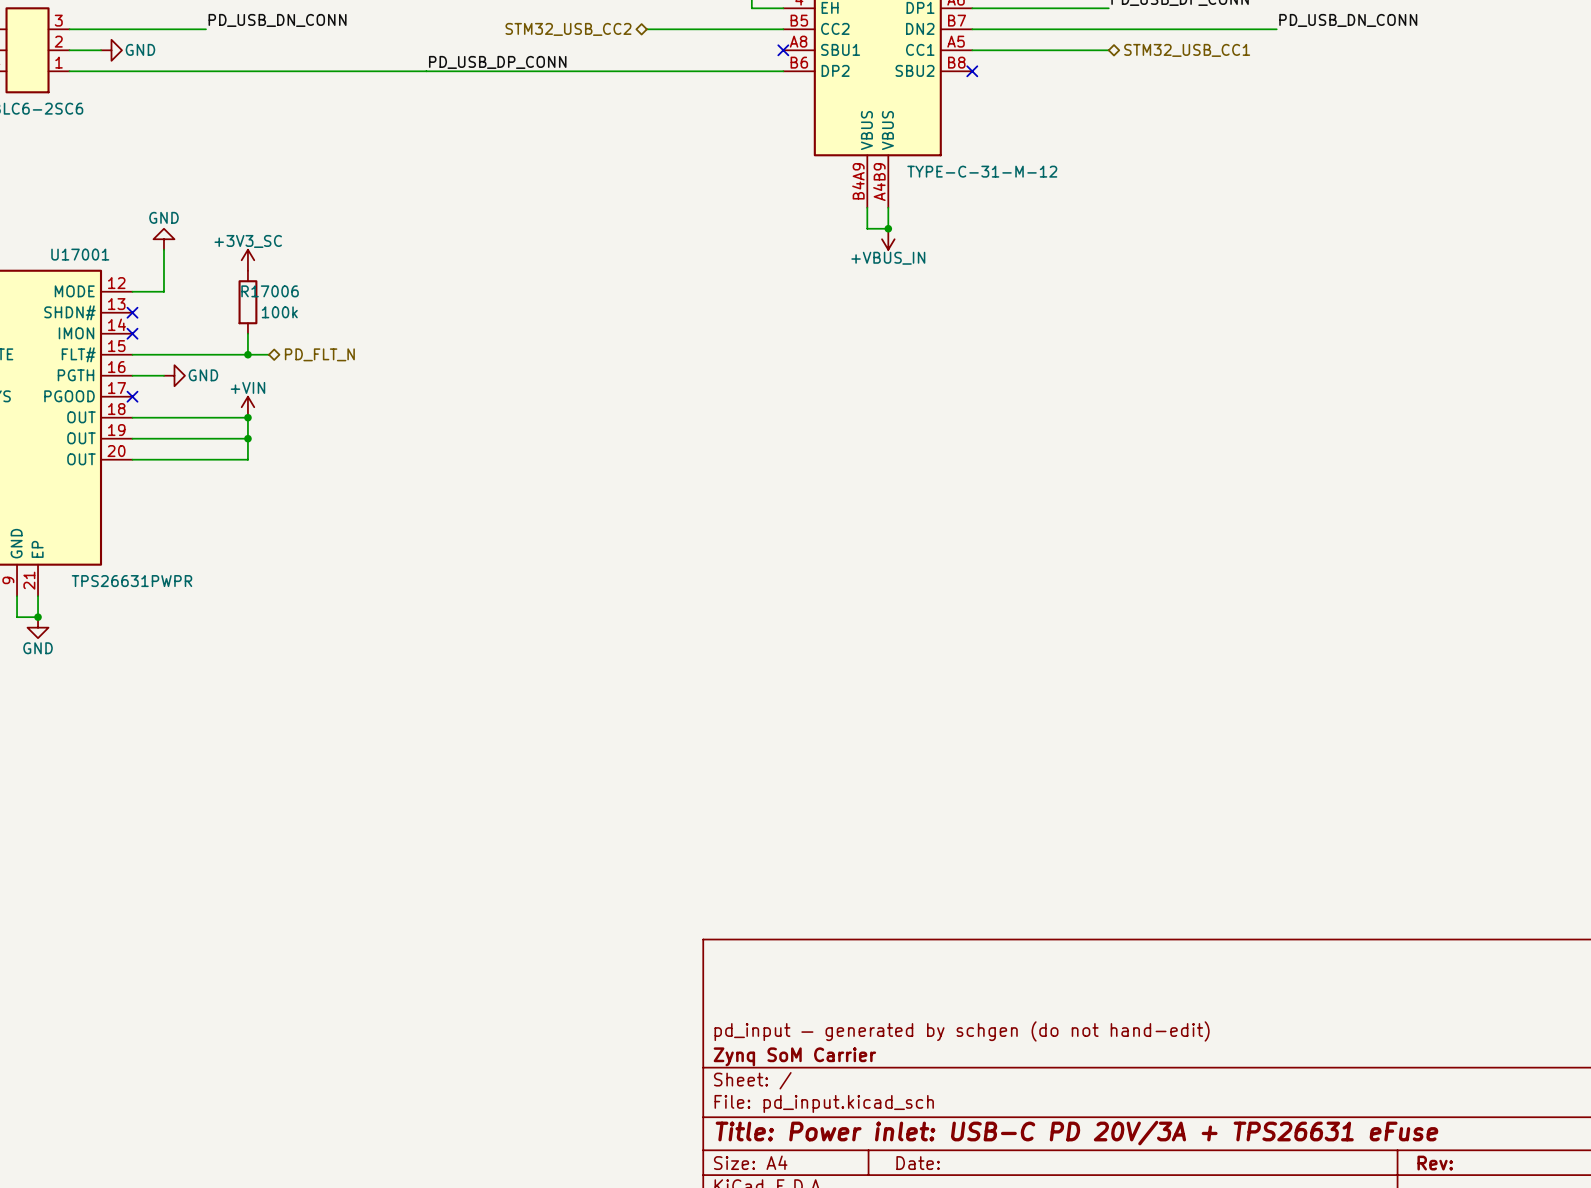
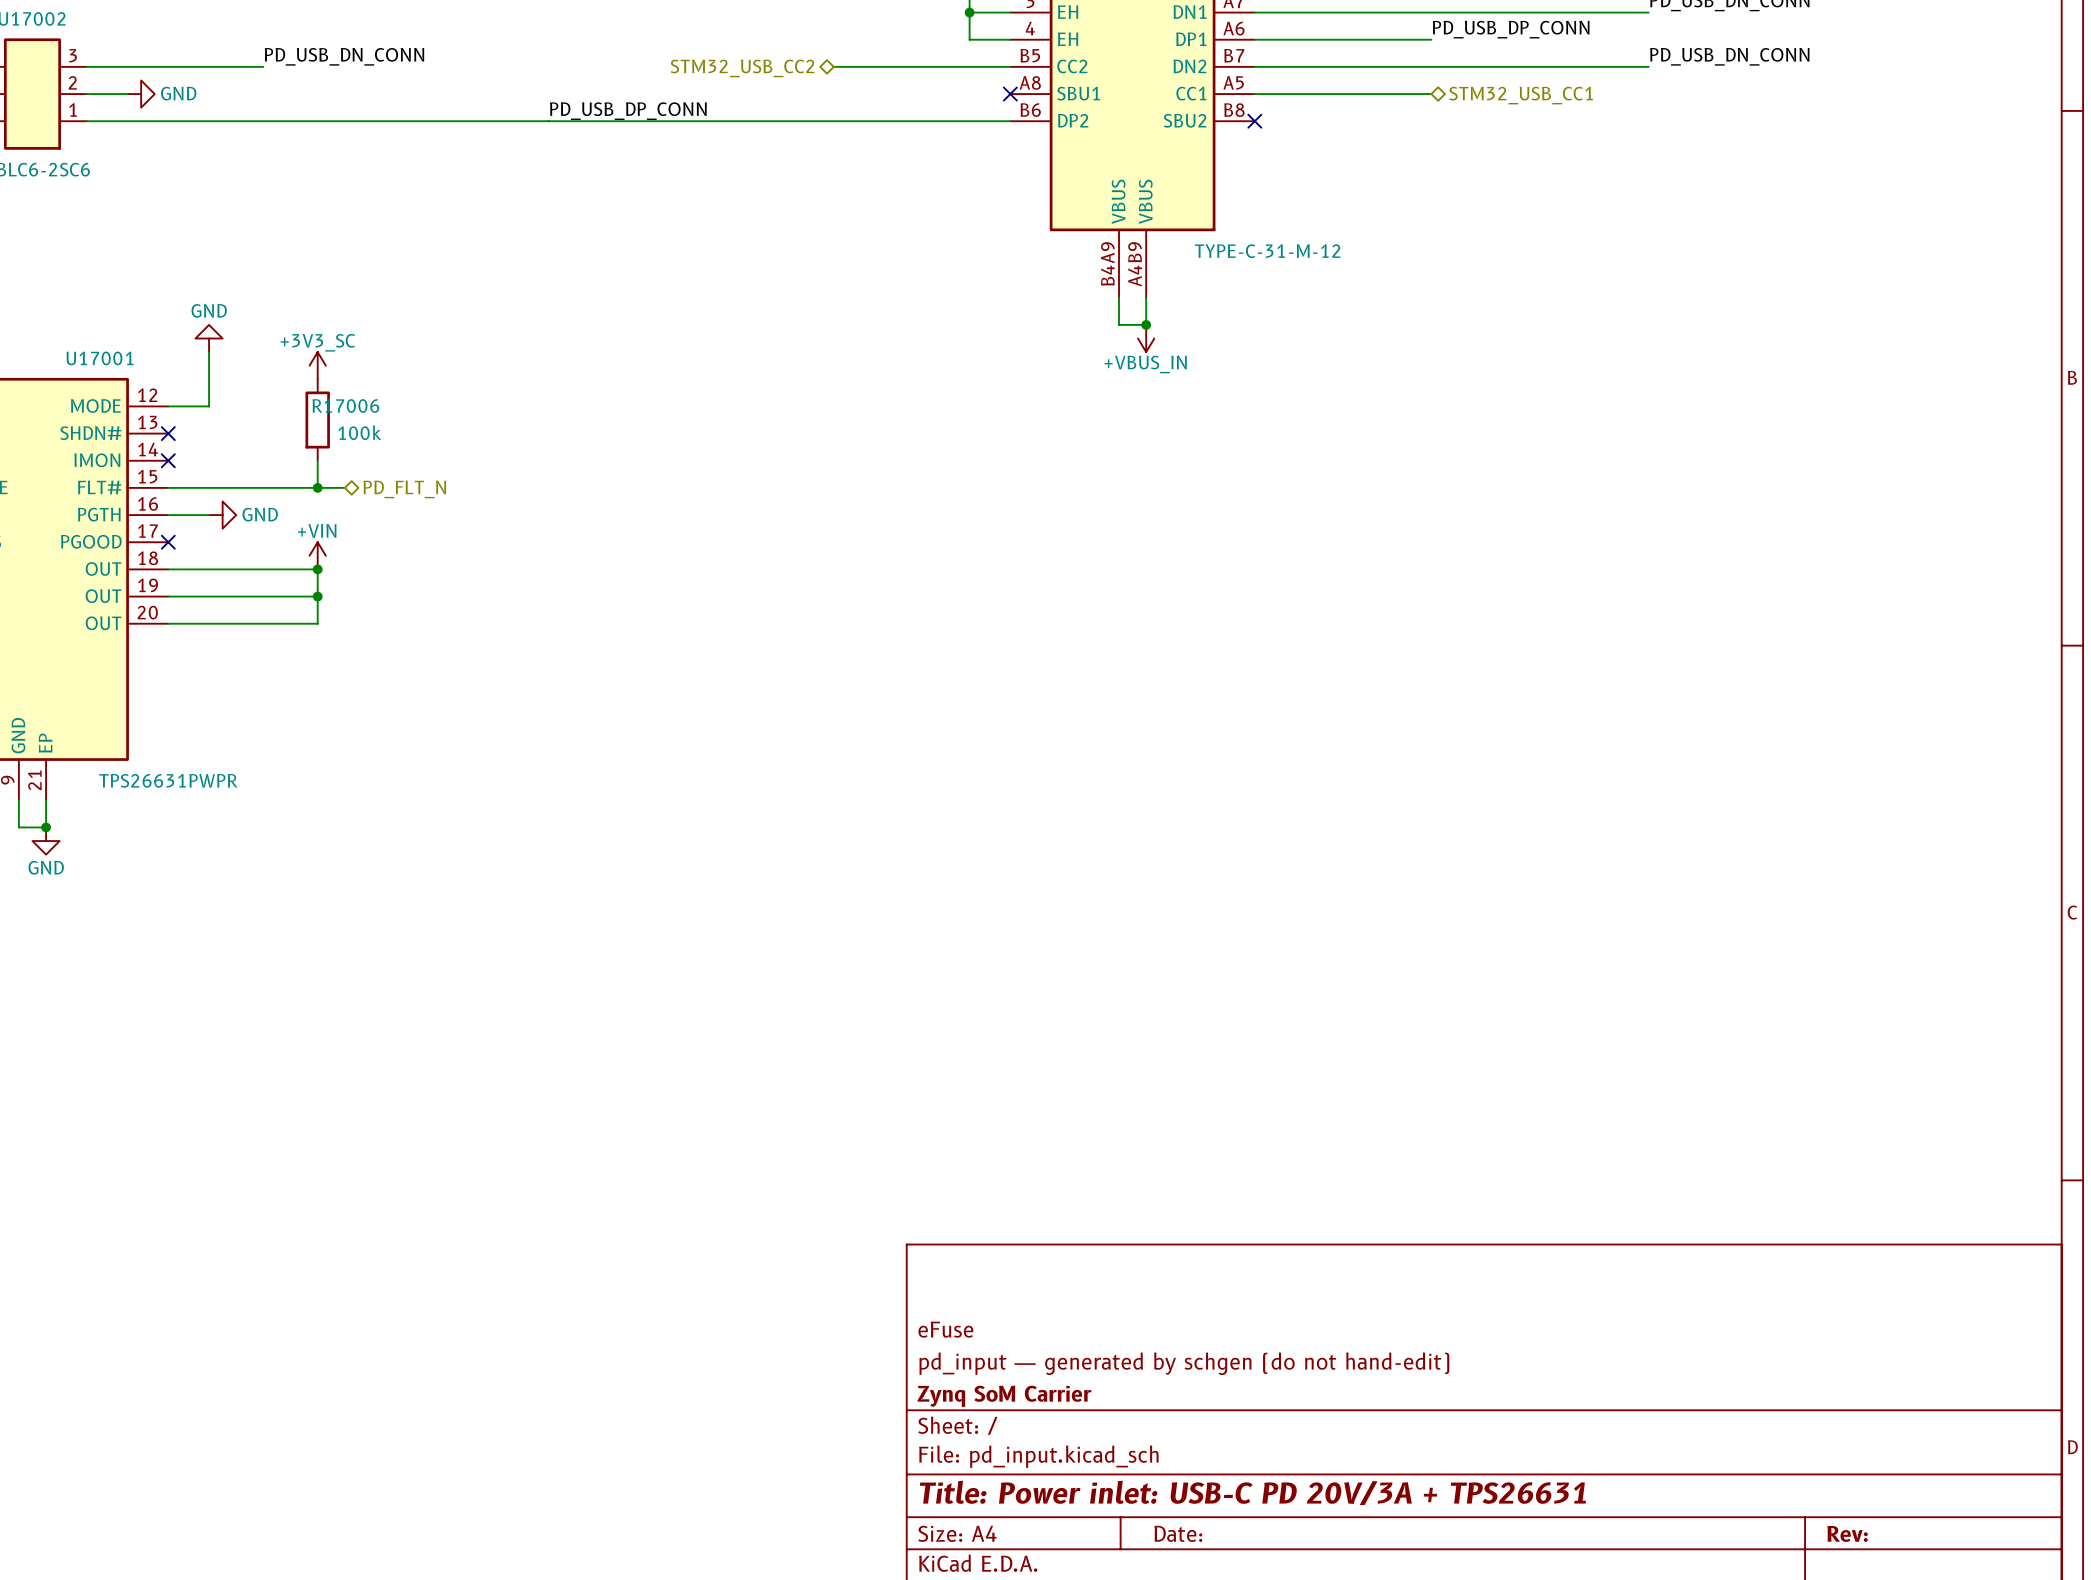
title block: none -> eFuse (945, 1329)
title block: Title: Power inlet: USB-C PD 20V/3A + TPS26631 eFuse (1076, 1133) -> Title: Power inlet: USB-C PD 20V/3A + TPS26631 (1252, 1492)

